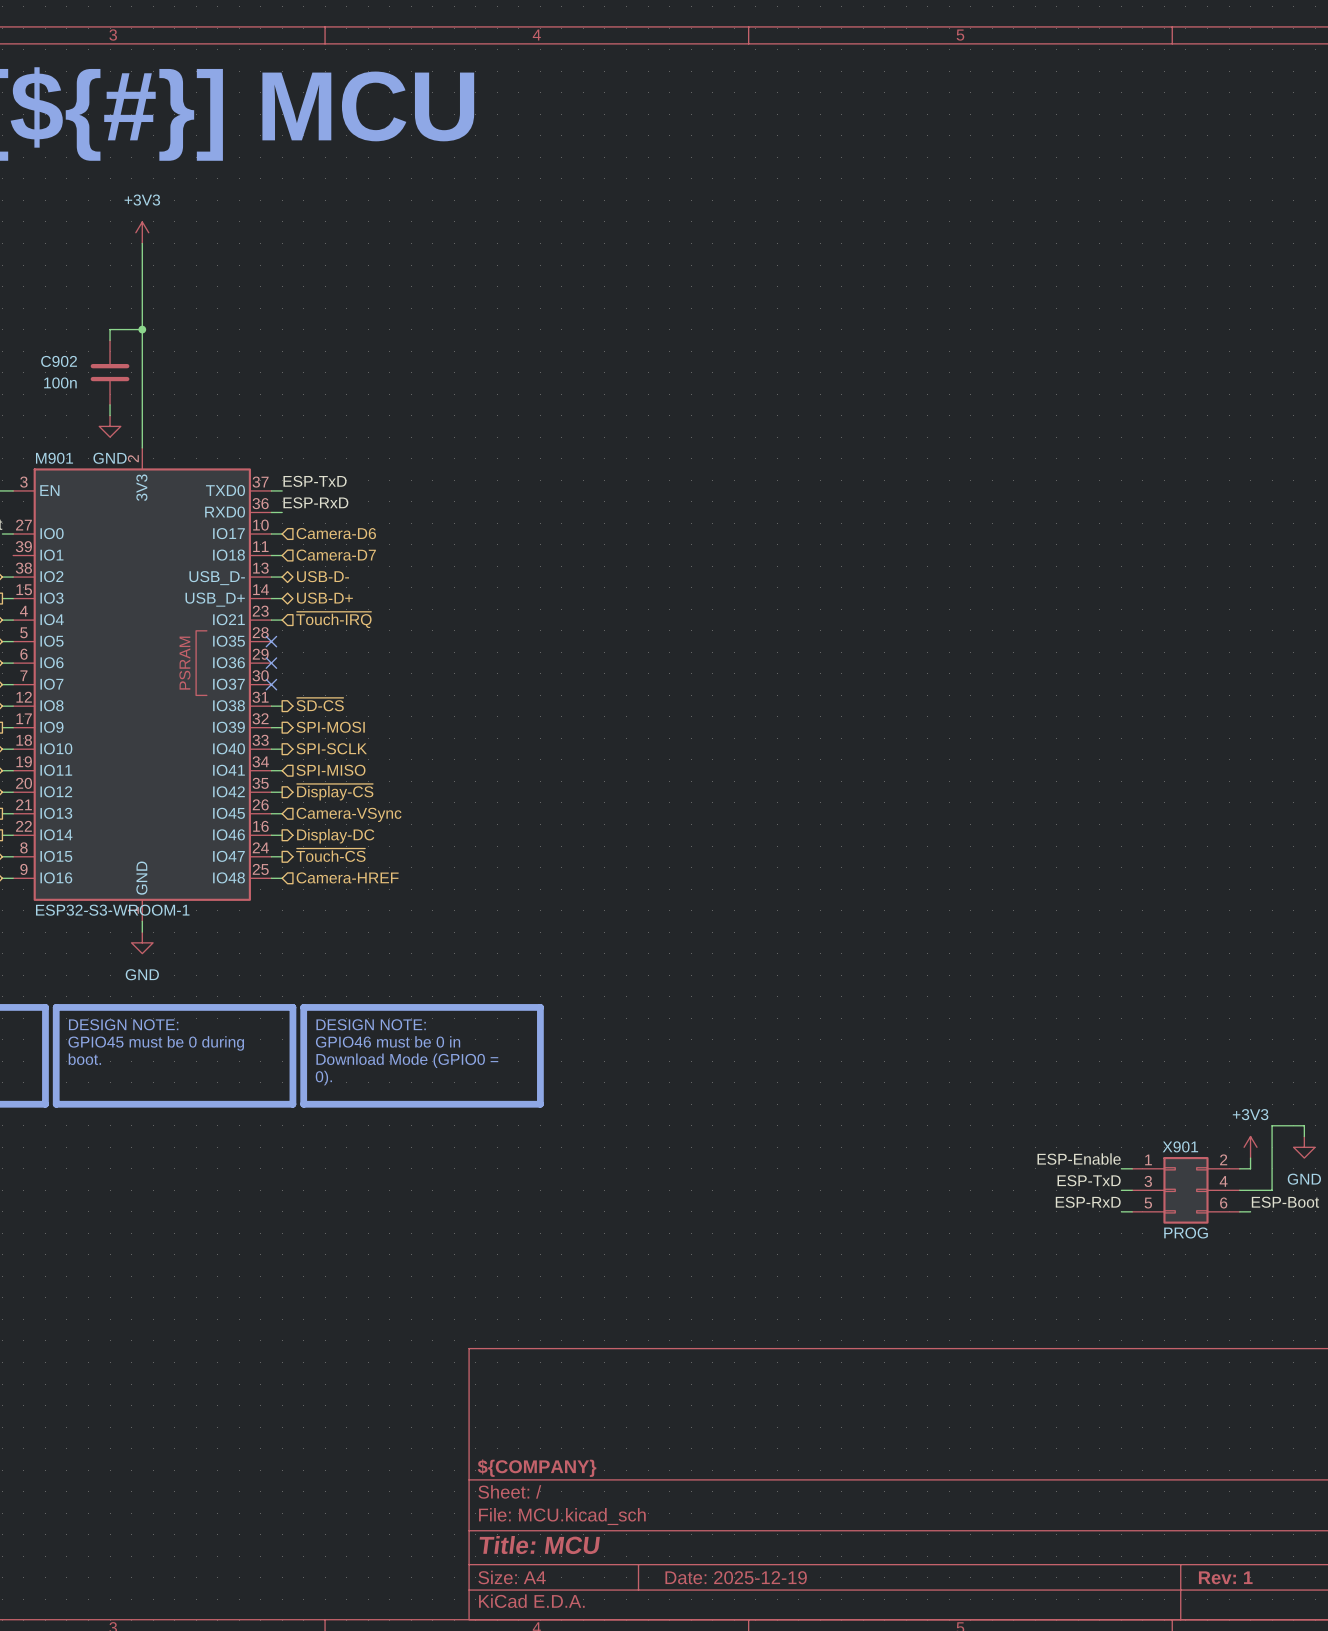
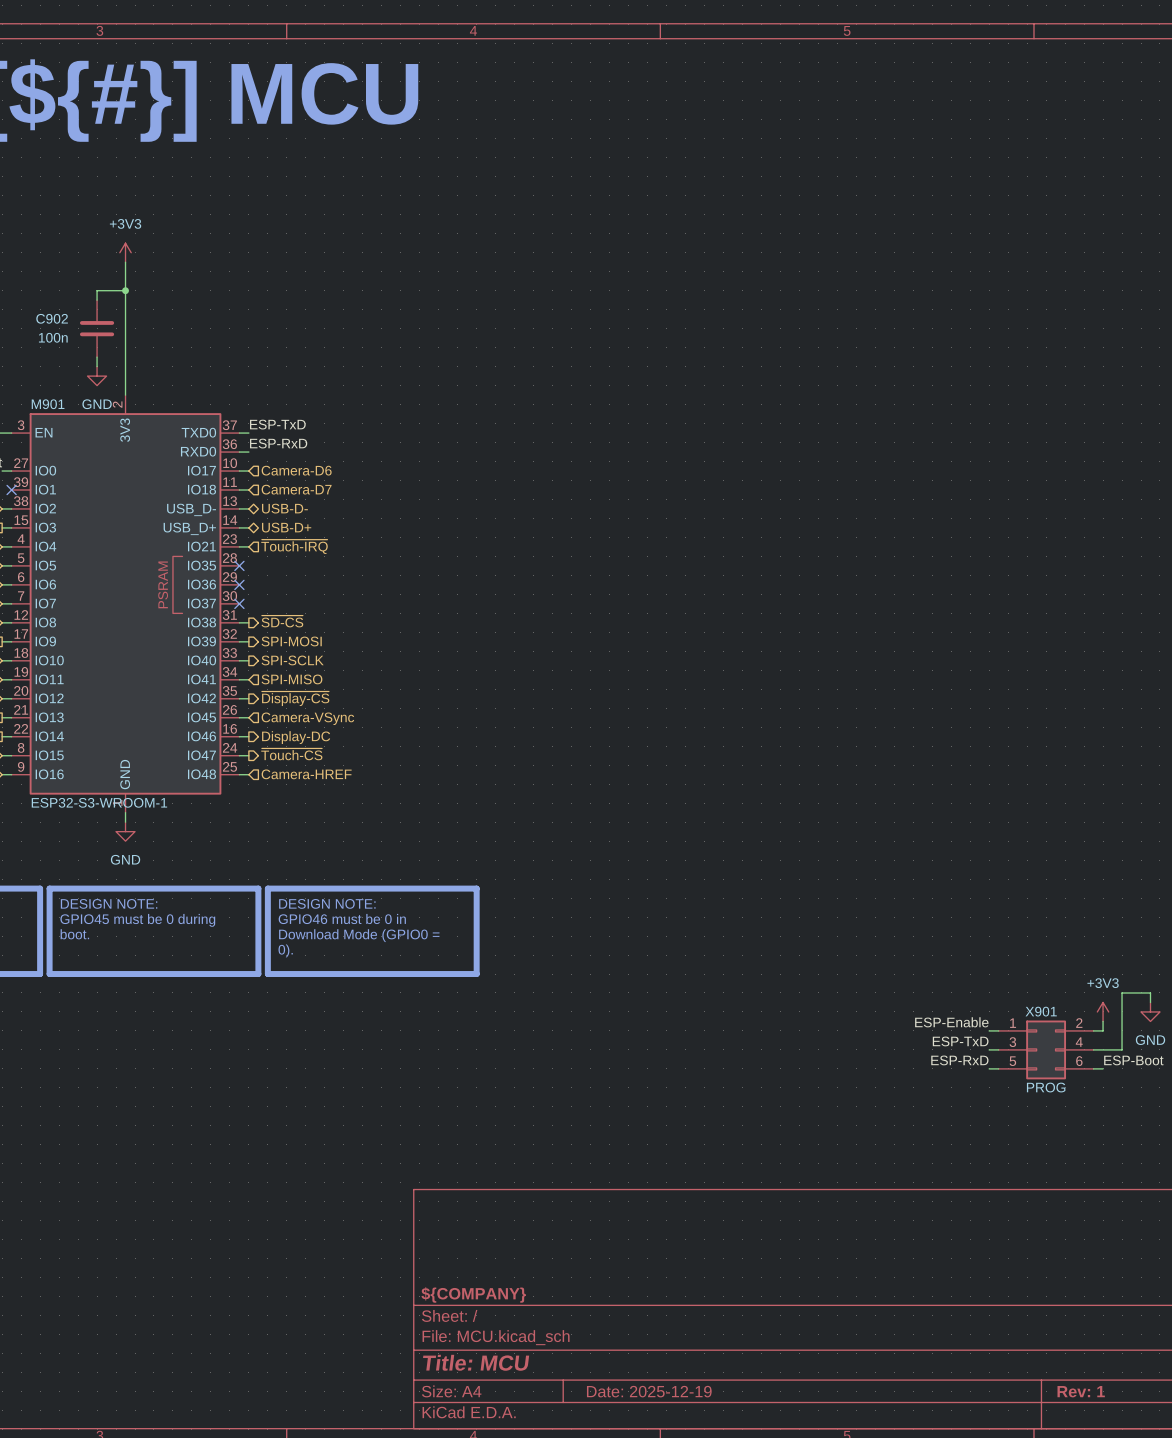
power symbol position: +3V3 (142, 232) -> +3V3 (125, 252)
wire: (142, 243) (142, 297) -> none
no-connect mark: none -> (11, 489)

